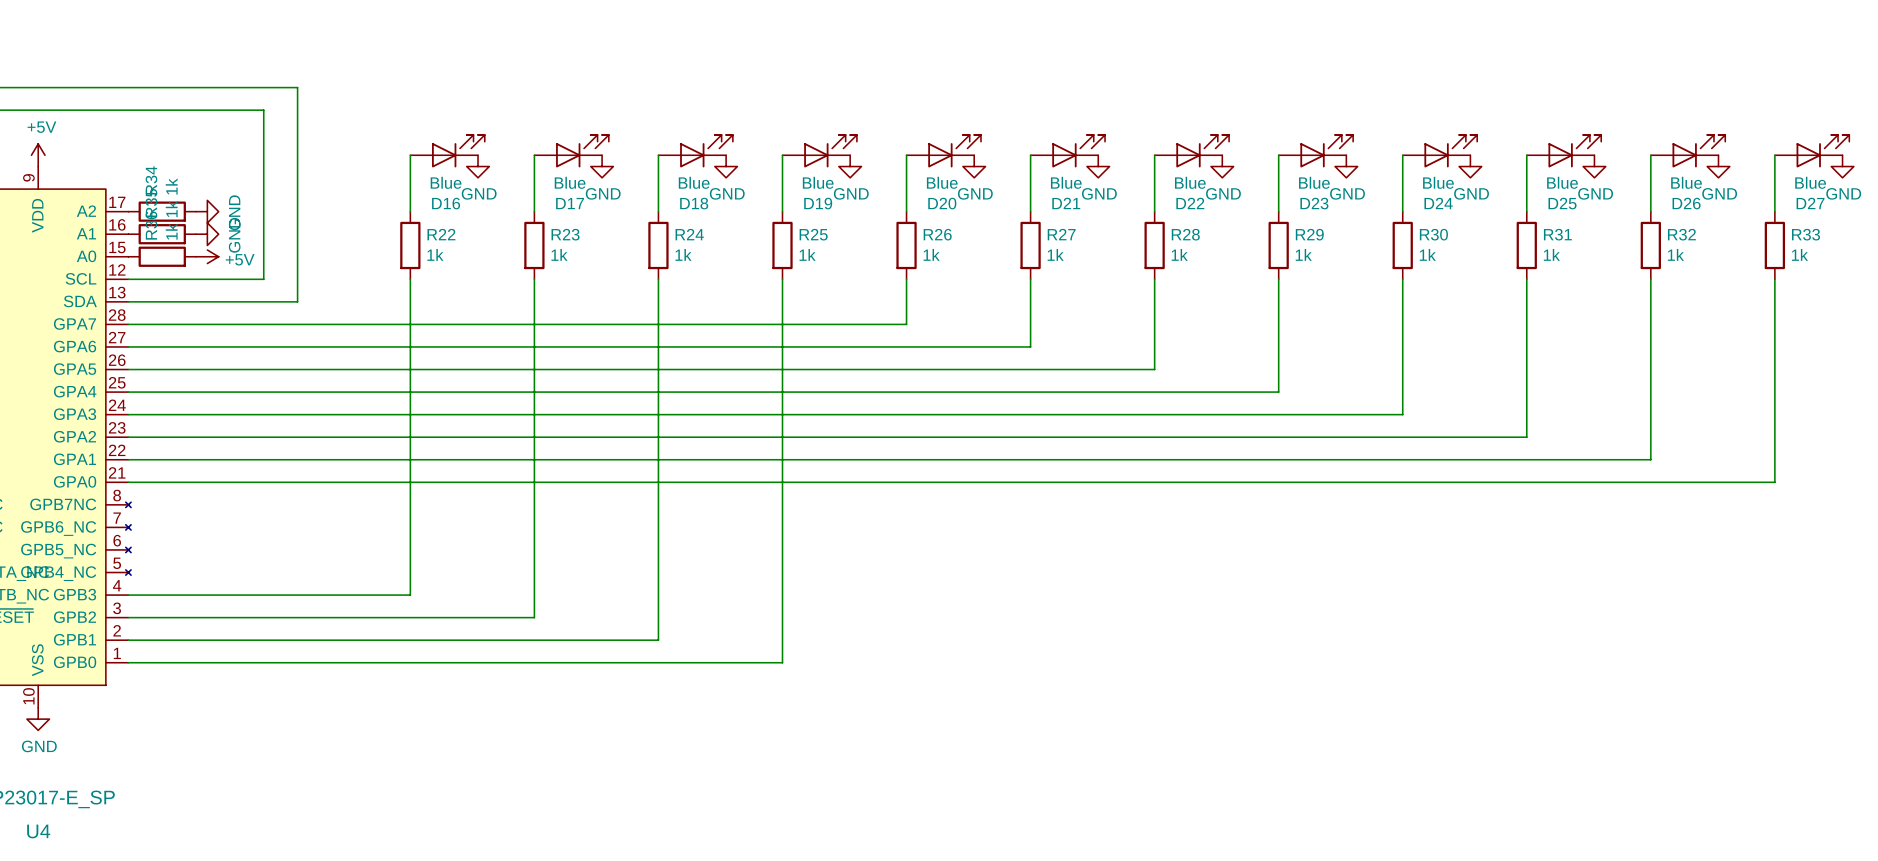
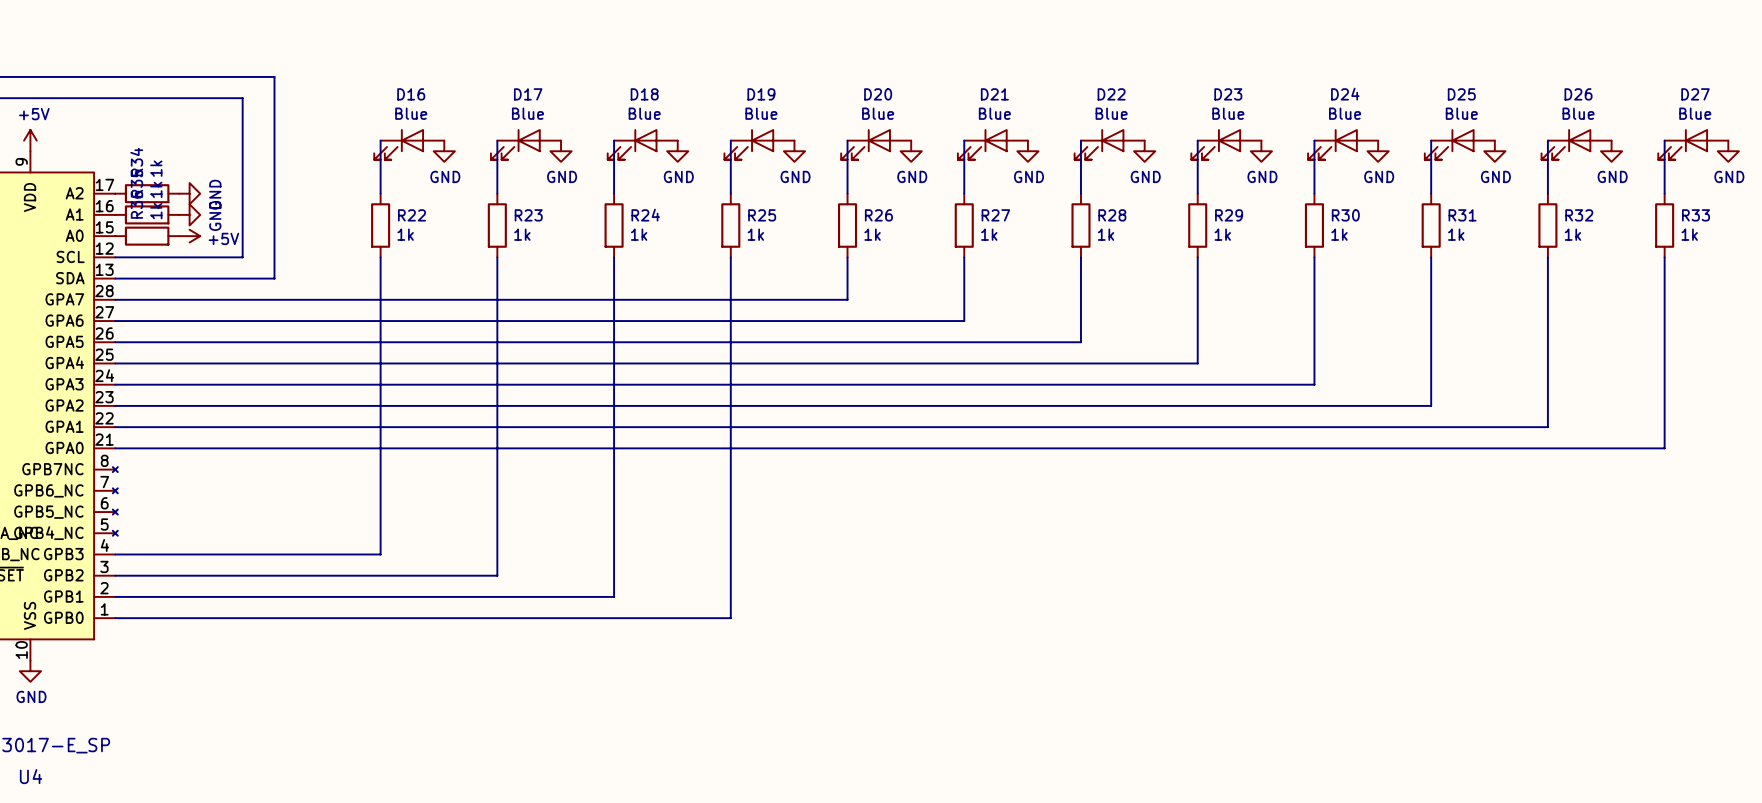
D16 rotation: 0° (458, 151) -> 180° (399, 144)
D17 rotation: 0° (582, 151) -> 180° (515, 144)
D18 rotation: 0° (706, 151) -> 180° (632, 144)
D19 rotation: 0° (830, 151) -> 180° (749, 144)
D20 rotation: 0° (954, 151) -> 180° (865, 144)
D21 rotation: 0° (1078, 151) -> 180° (982, 144)
D22 rotation: 0° (1202, 151) -> 180° (1099, 144)
D23 rotation: 0° (1326, 151) -> 180° (1216, 144)
D24 rotation: 0° (1450, 151) -> 180° (1332, 144)
D25 rotation: 0° (1574, 151) -> 180° (1449, 144)
D26 rotation: 0° (1698, 151) -> 180° (1566, 144)
D27 rotation: 0° (1822, 151) -> 180° (1683, 144)

